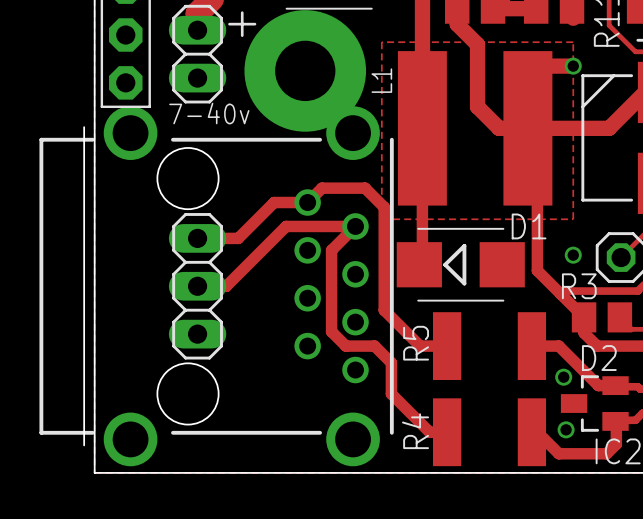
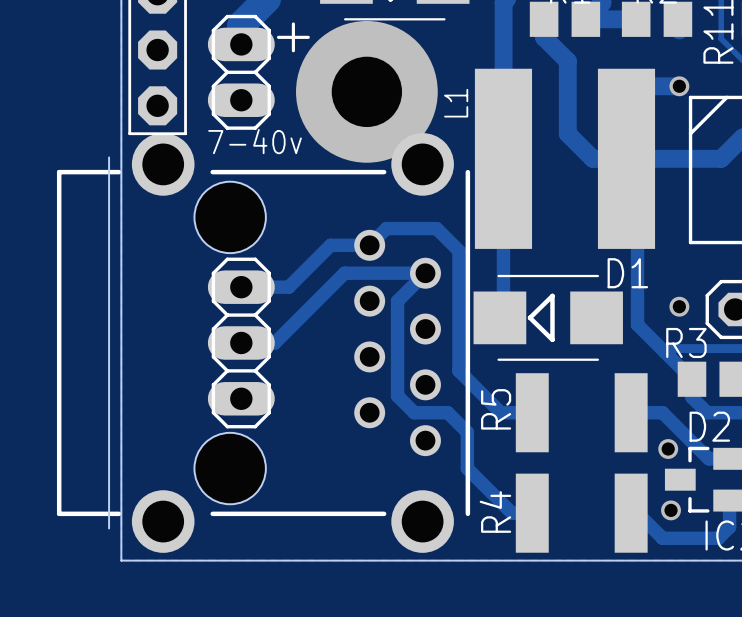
zone outline: (381, 42) (381, 219) (573, 219) (573, 42) (381, 42) -> none

